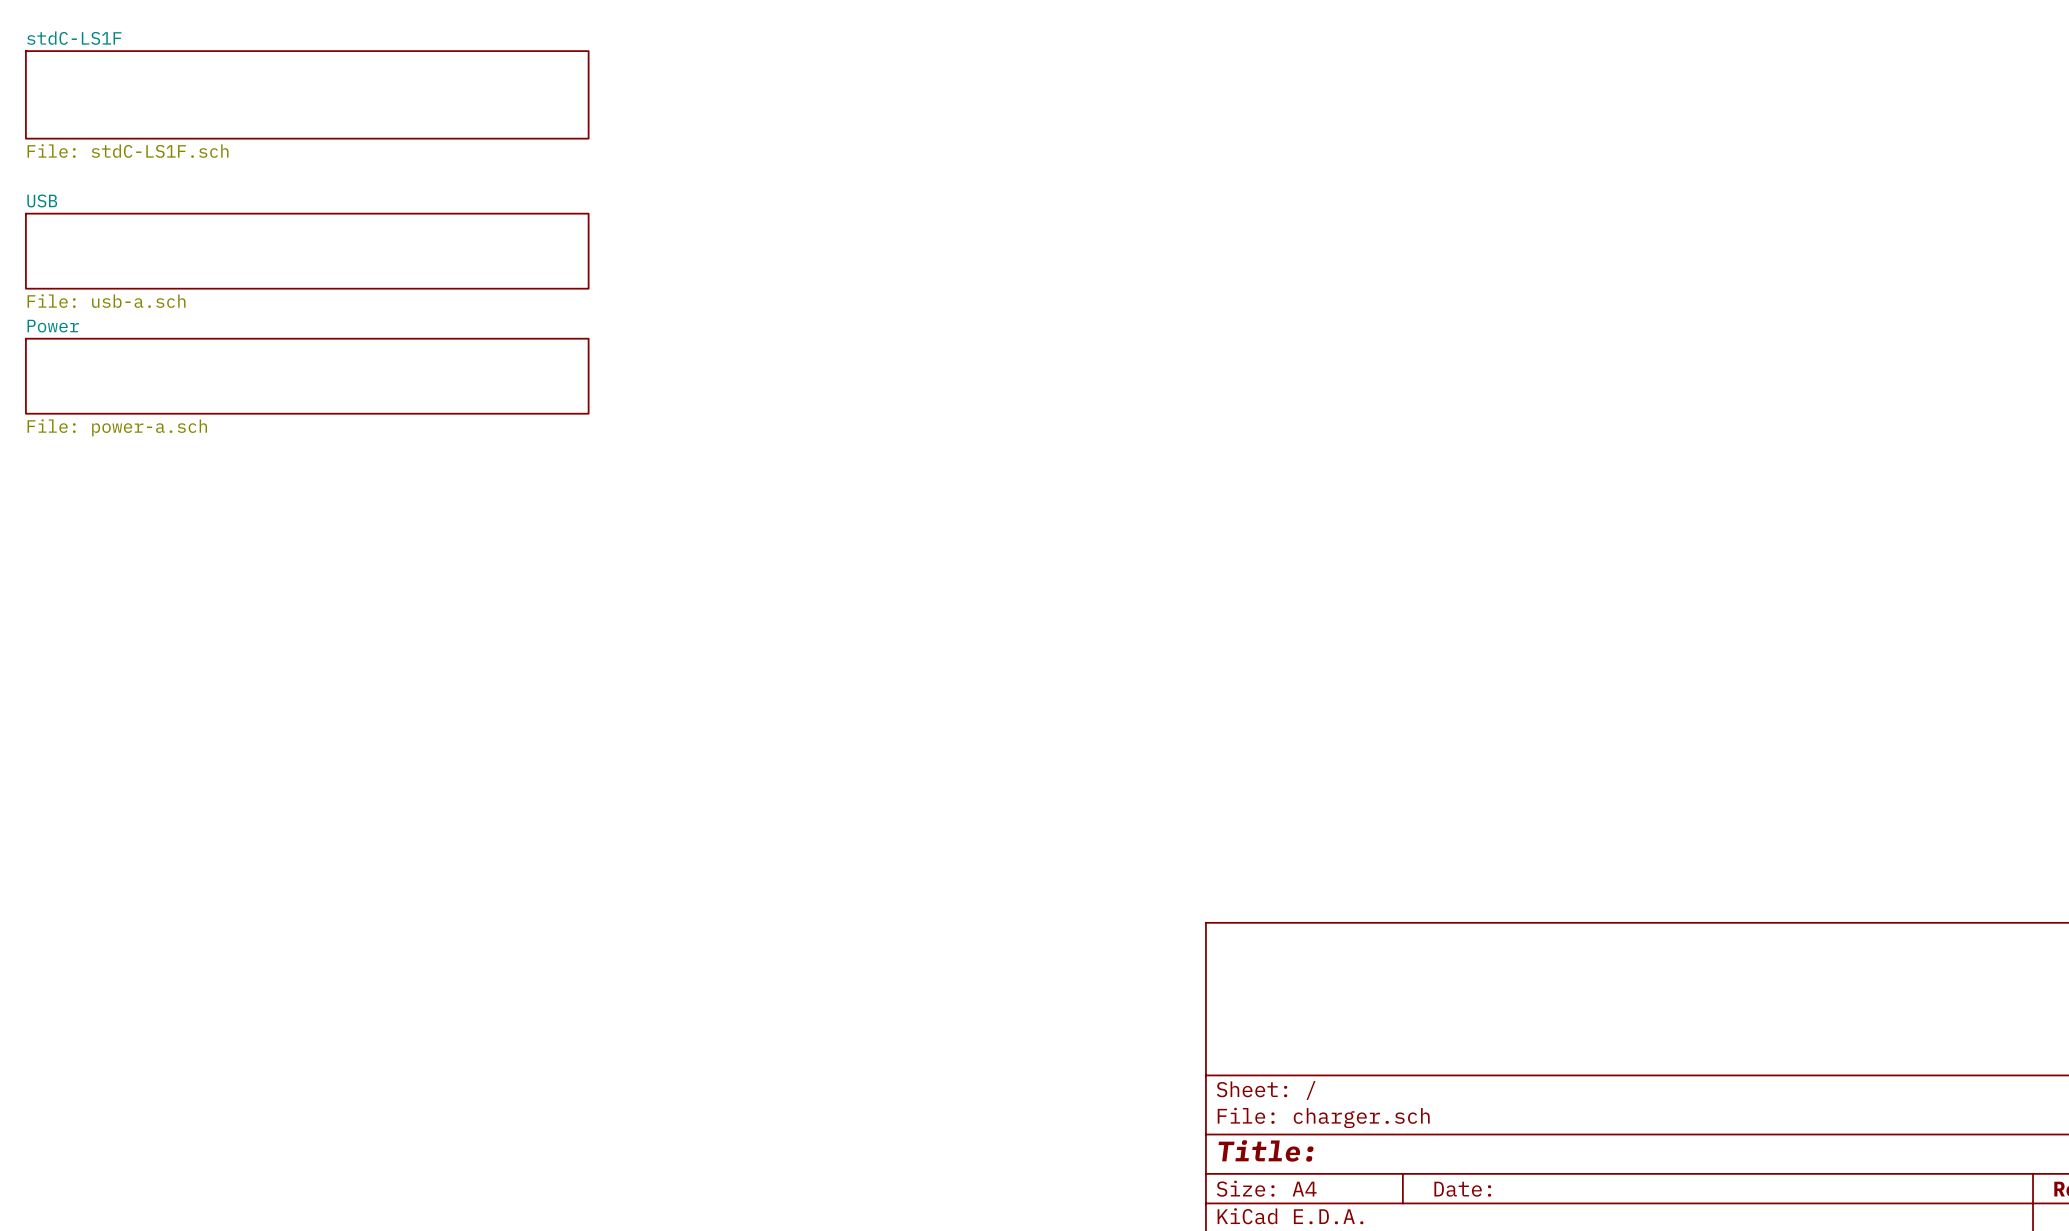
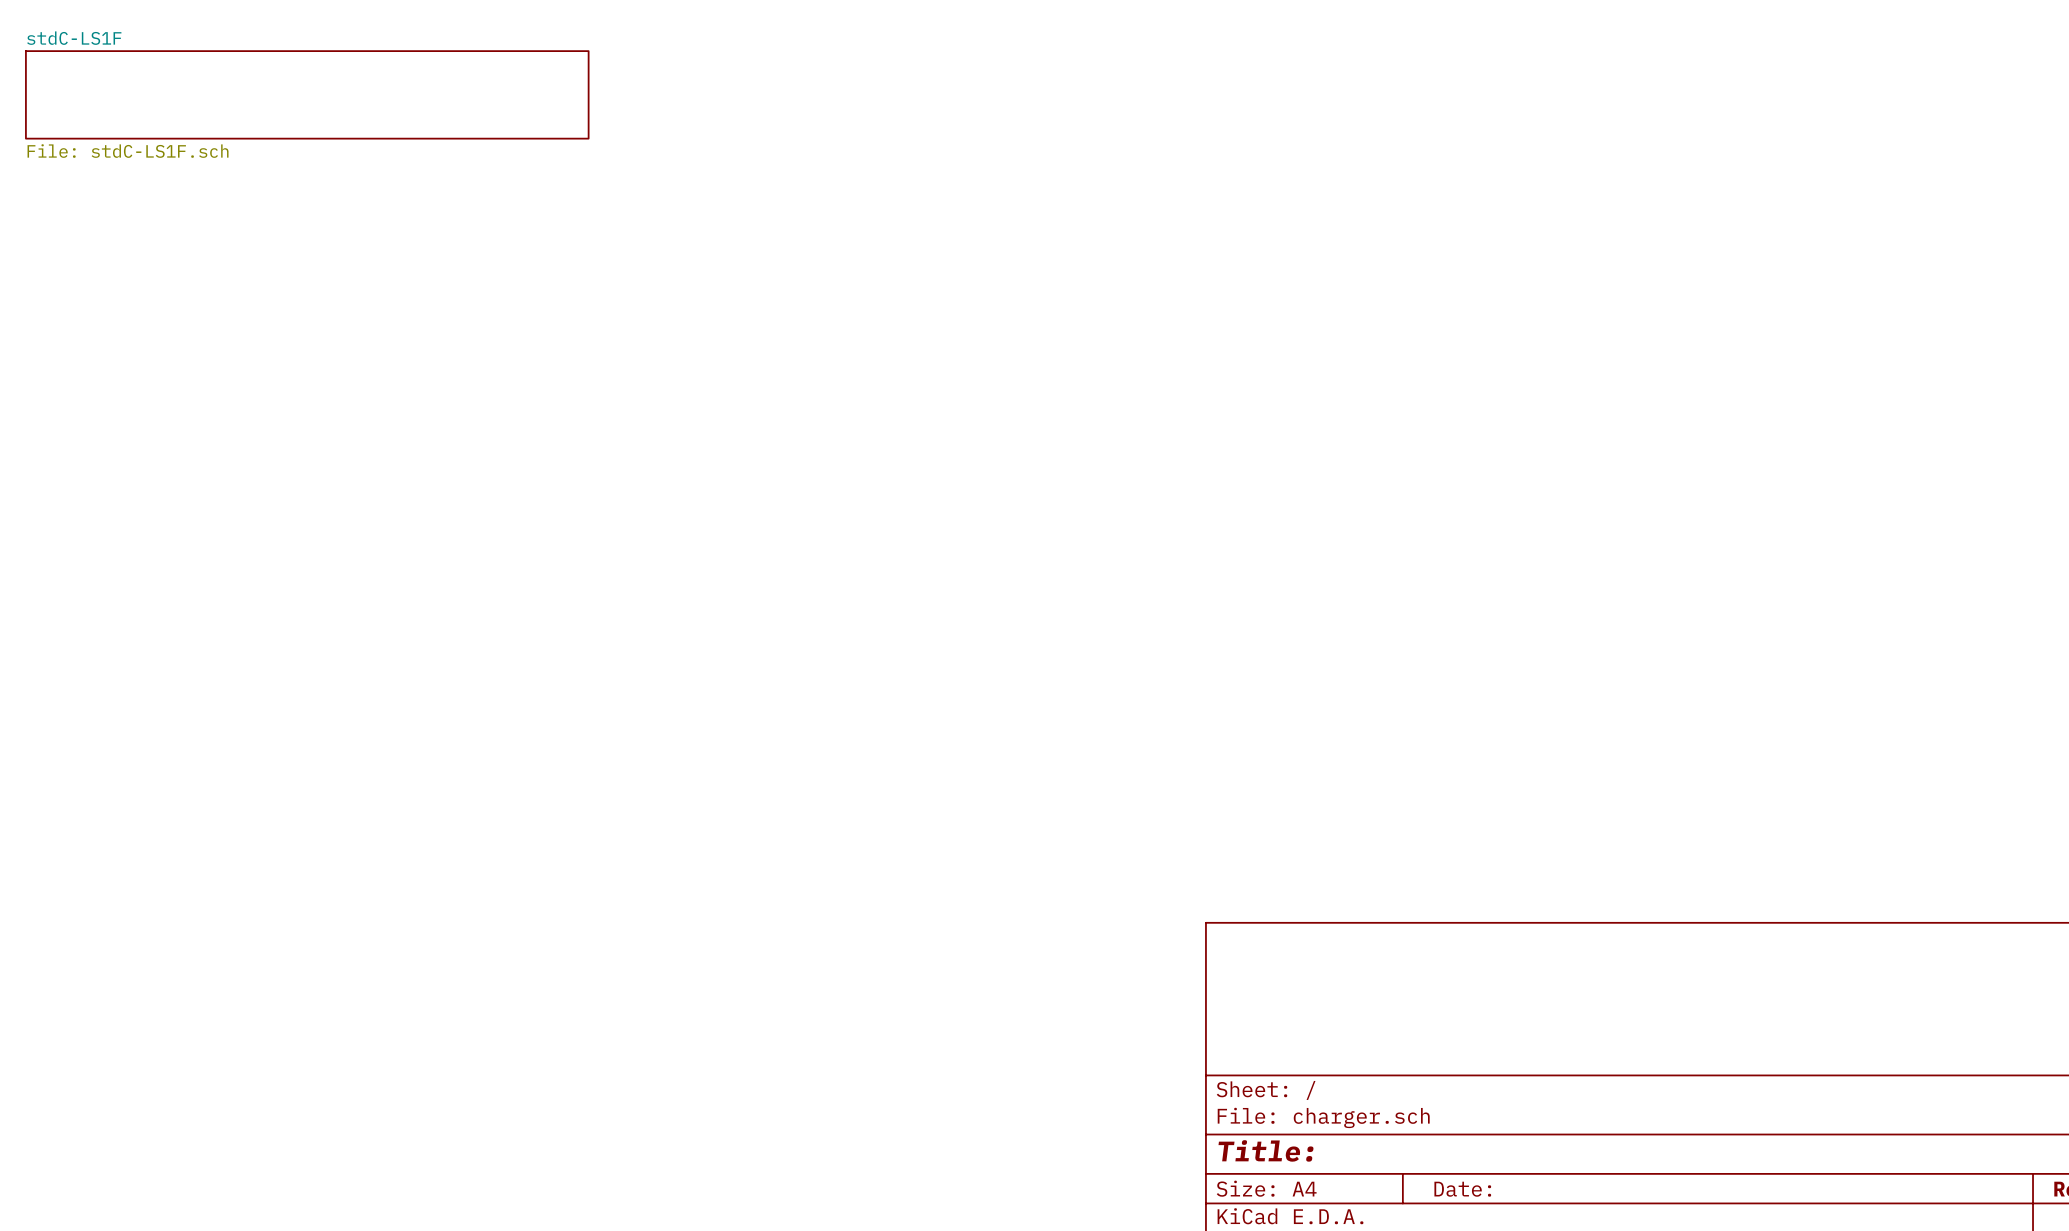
sheet USB: File: usb-a.sch (307, 251) -> none
sheet Power: File: power-a.sch (307, 376) -> none

